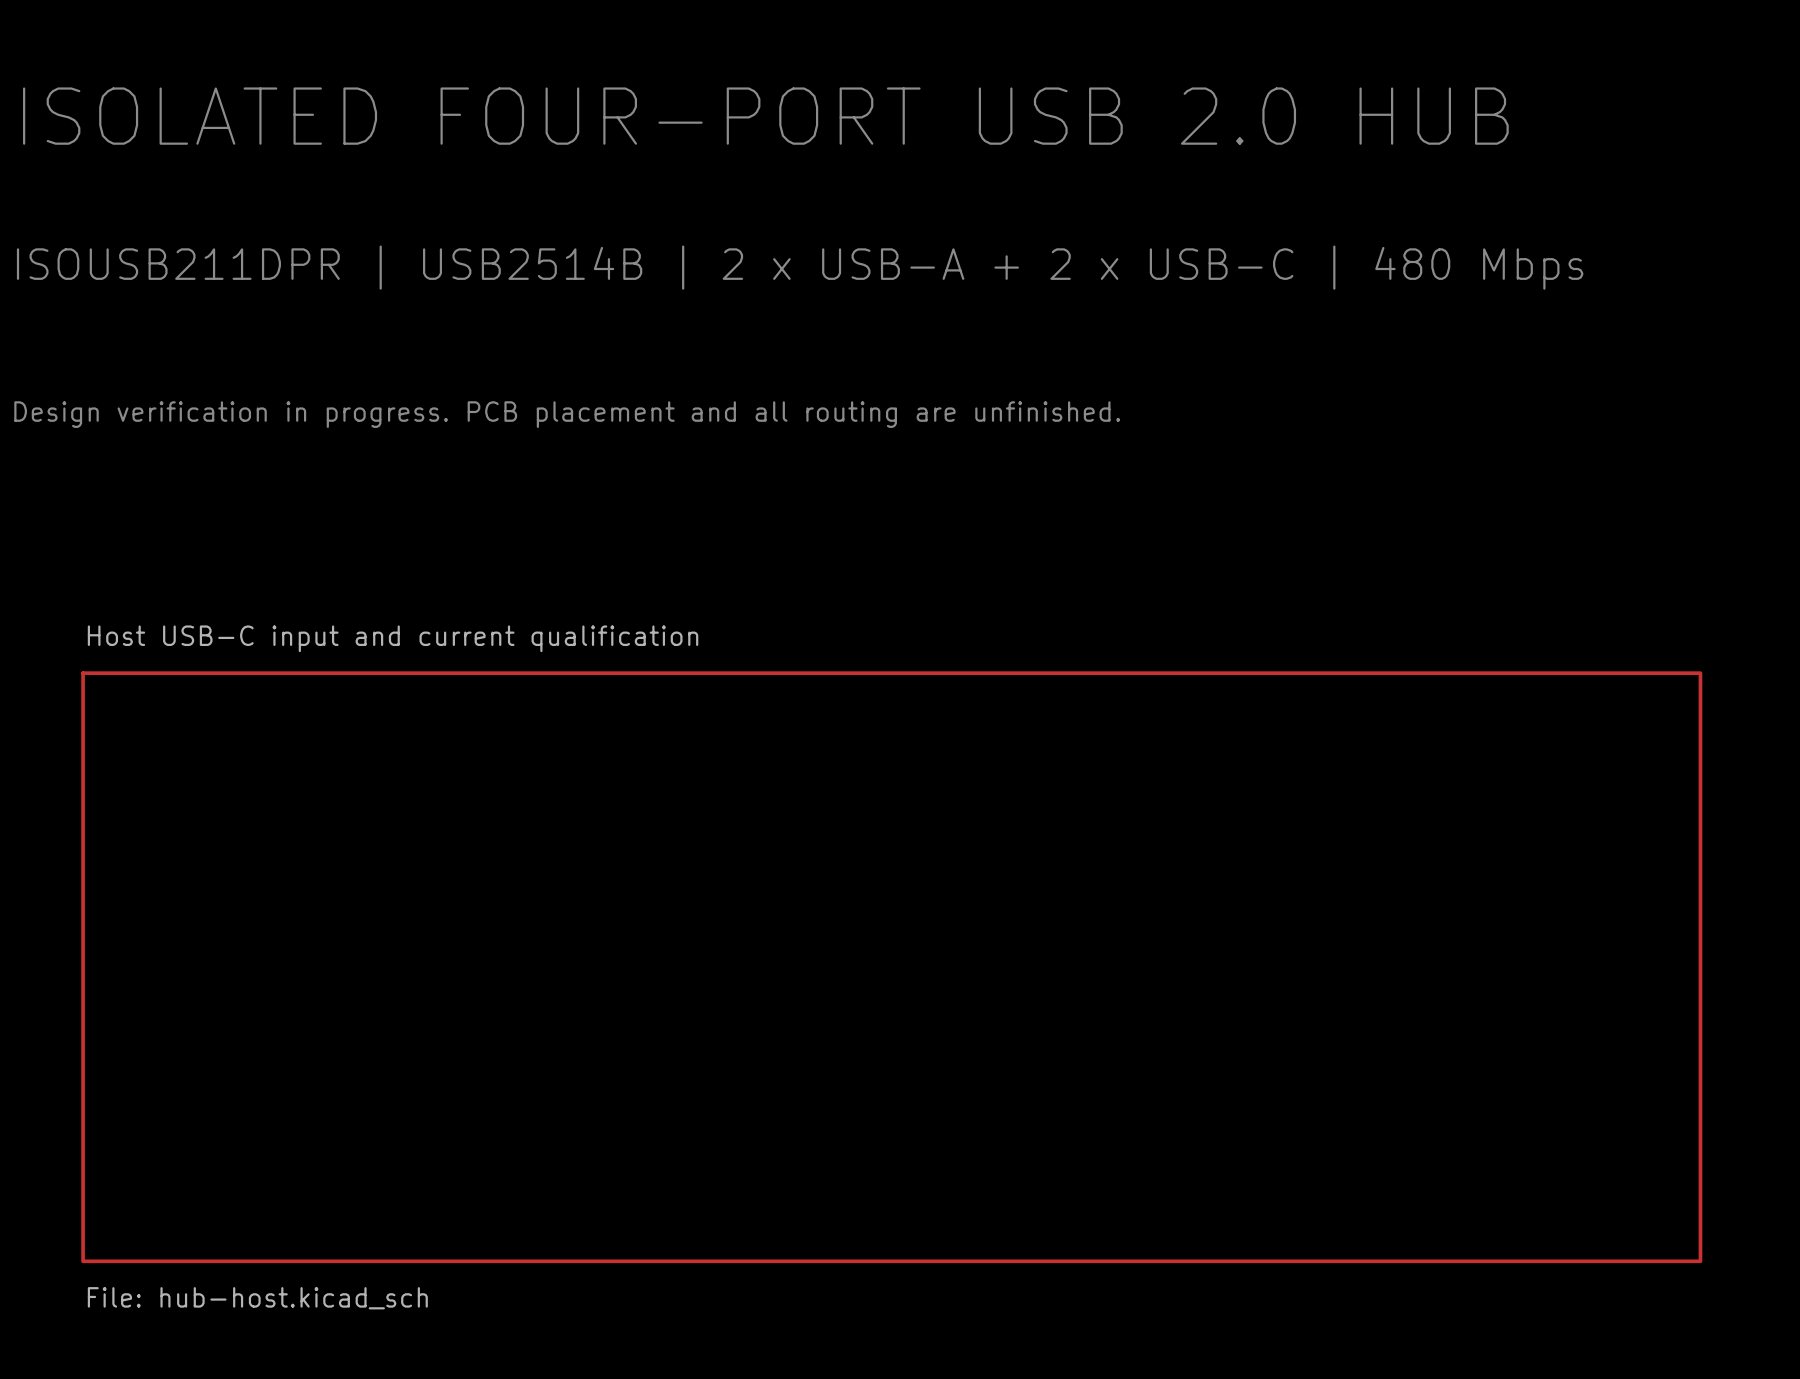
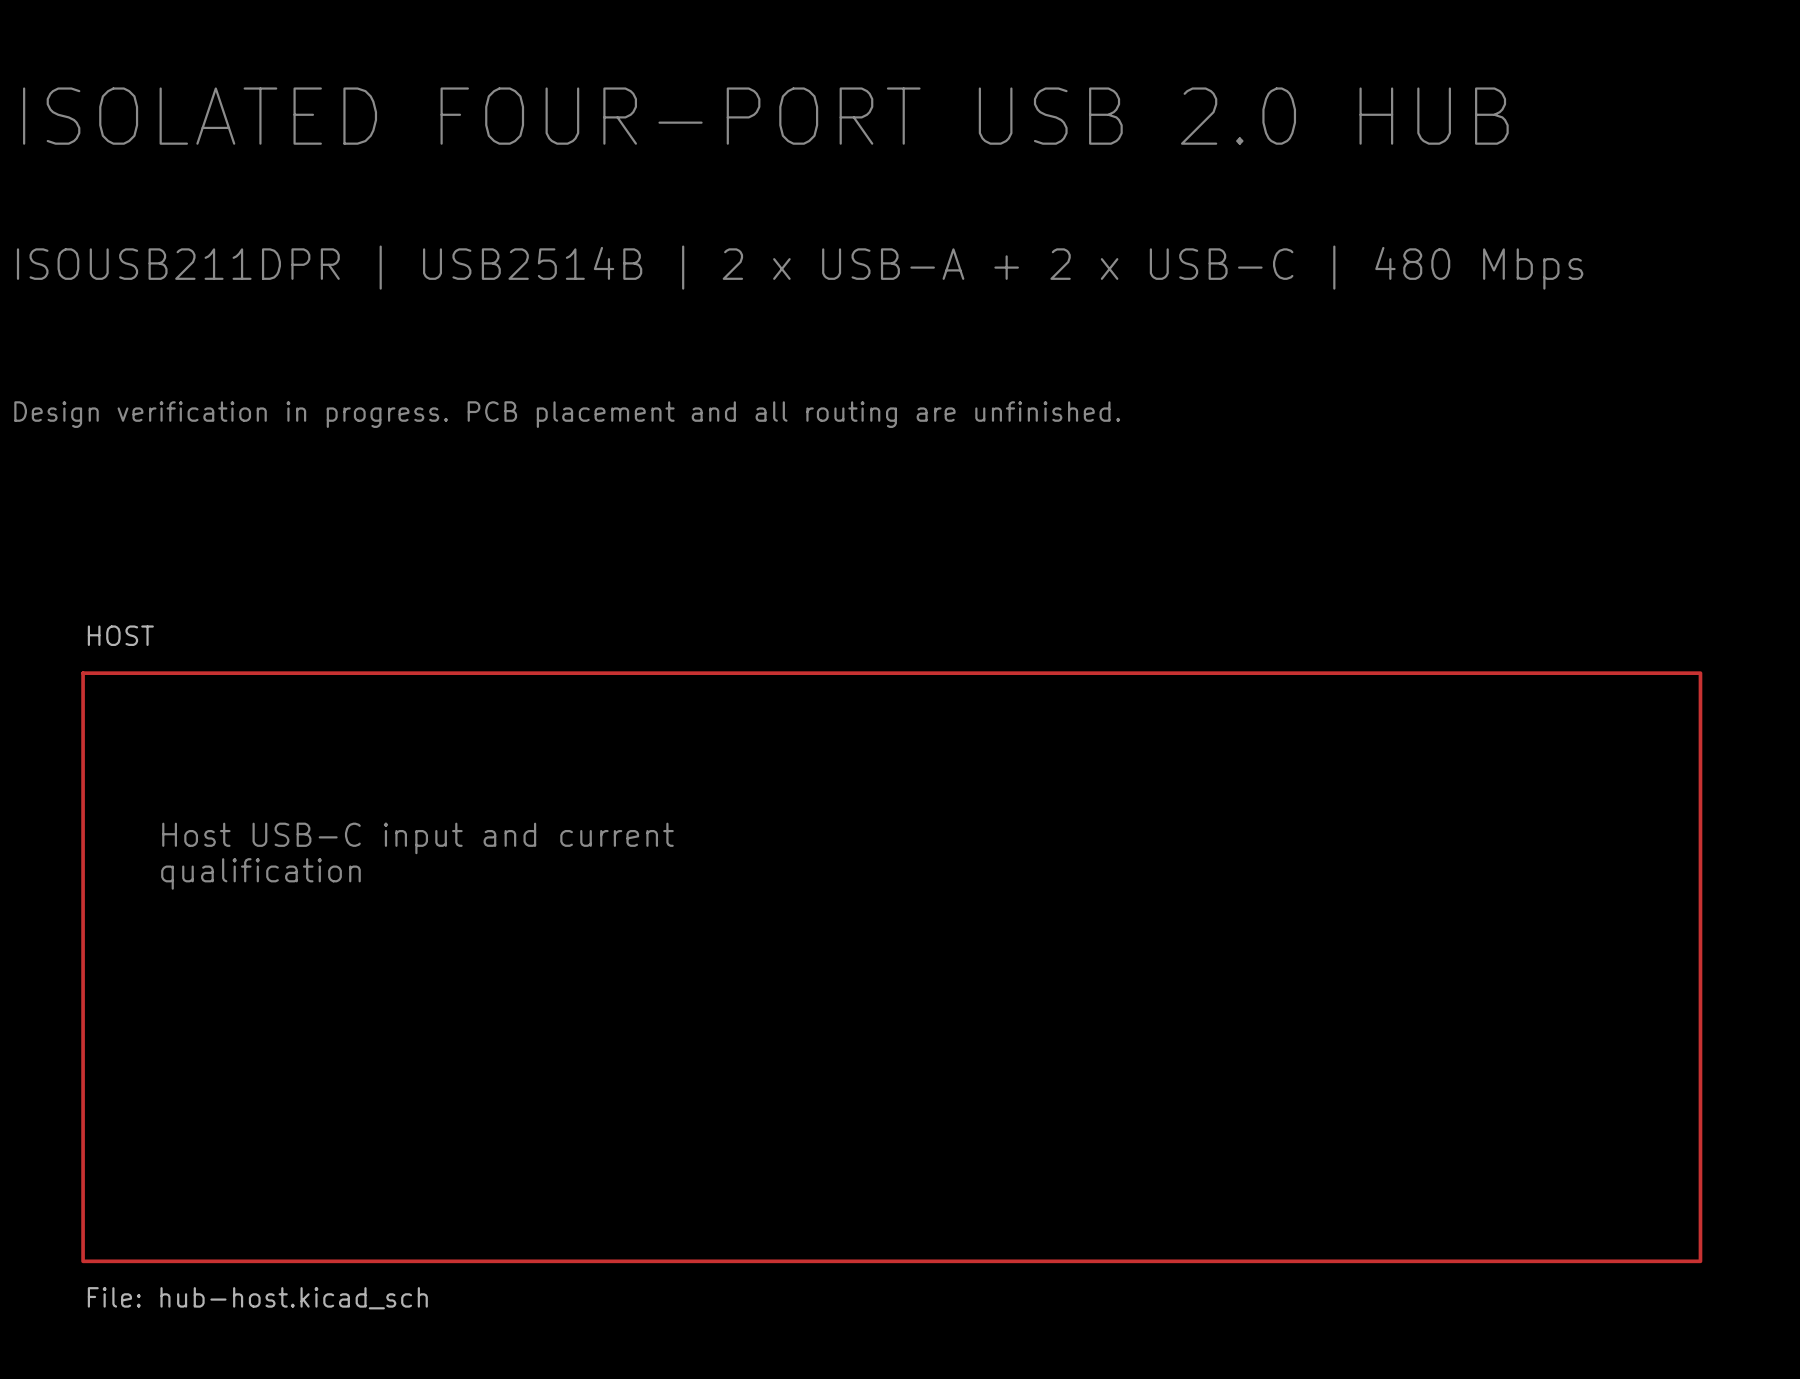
sheet Host USB-C input and current qualification name: Host USB-C input and current qualification (393, 638) -> HOST (120, 635)
text: none -> Host USB-C input and current (417, 838)
text: none -> qualification (260, 873)

